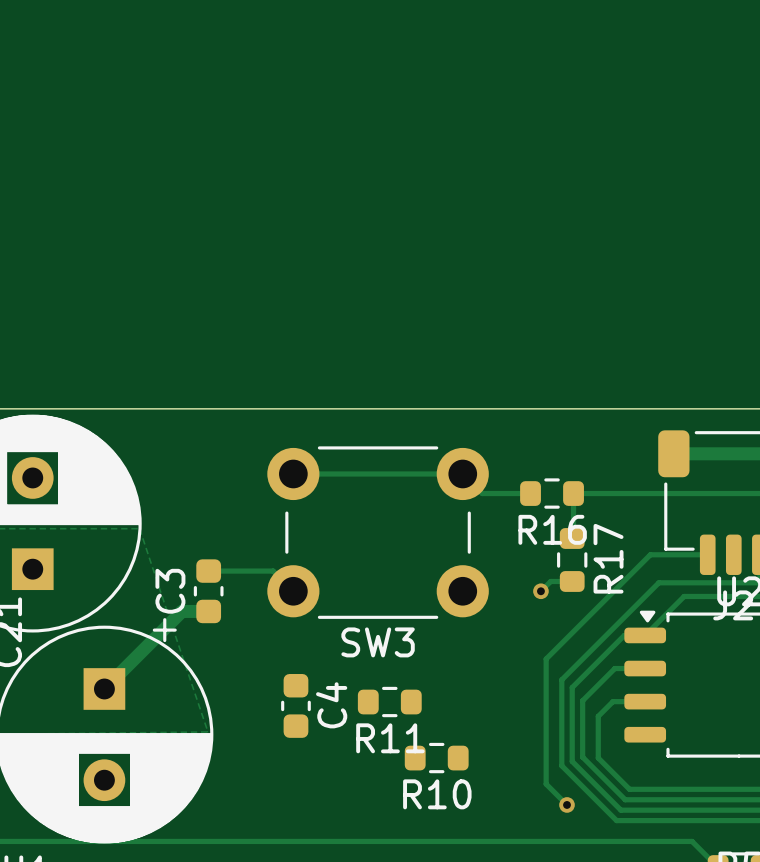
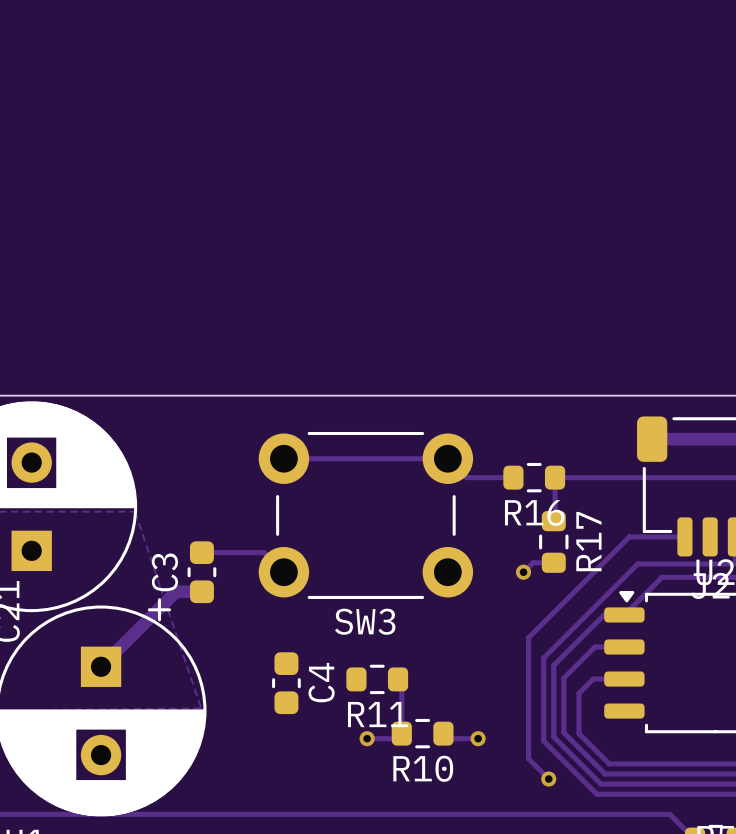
track: none -> (398, 679) (401, 683) (401, 733) (396, 738) (367, 738)
track: none -> (443, 733) (448, 738) (478, 738)
via: none -> (367, 738)
via: none -> (478, 738)

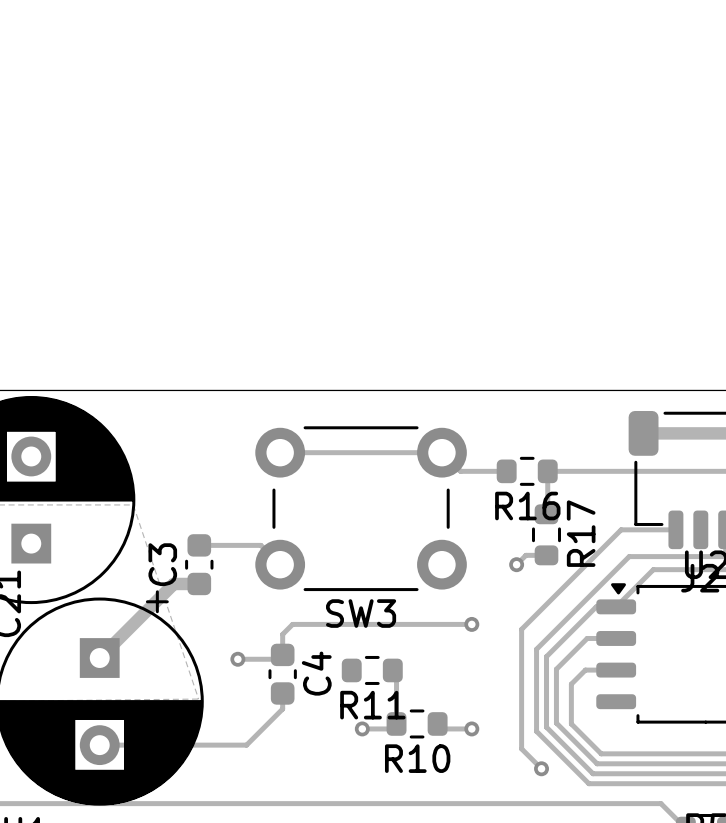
track: none -> (471, 624) (292, 624) (282, 634) (282, 654) (278, 659) (237, 659)
via: none -> (471, 624)
via: none -> (237, 659)
track: none -> (282, 693) (282, 709) (246, 745) (99, 745)

